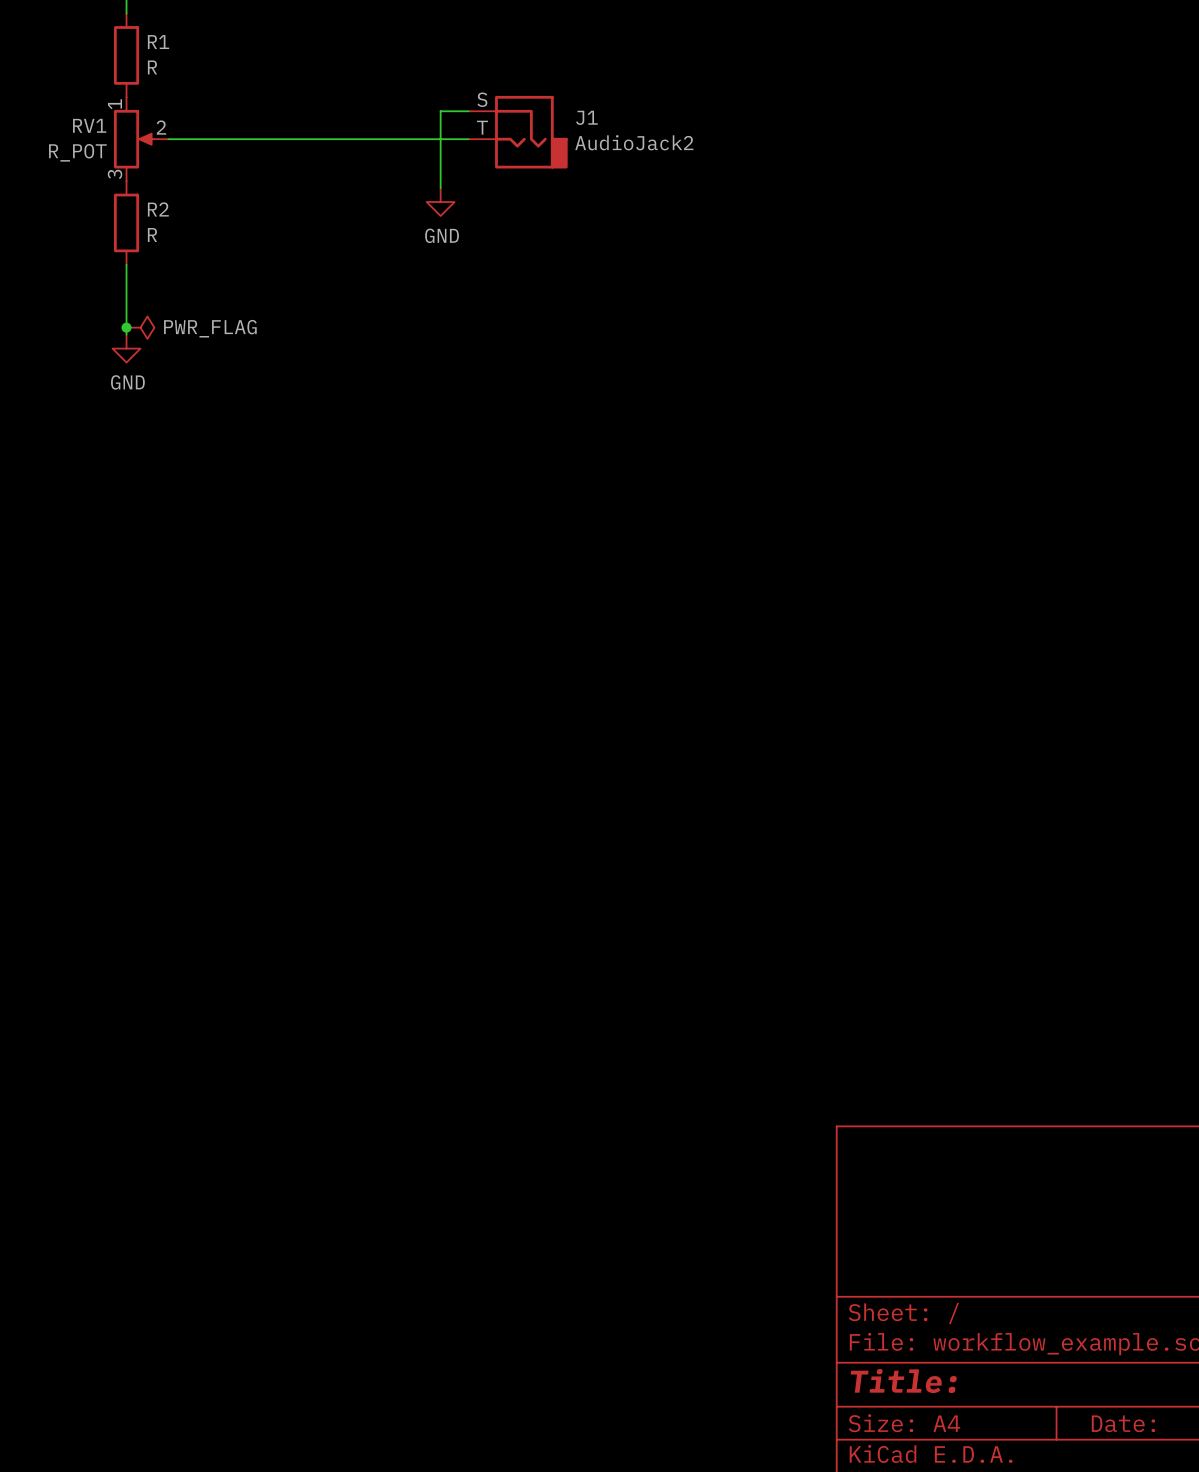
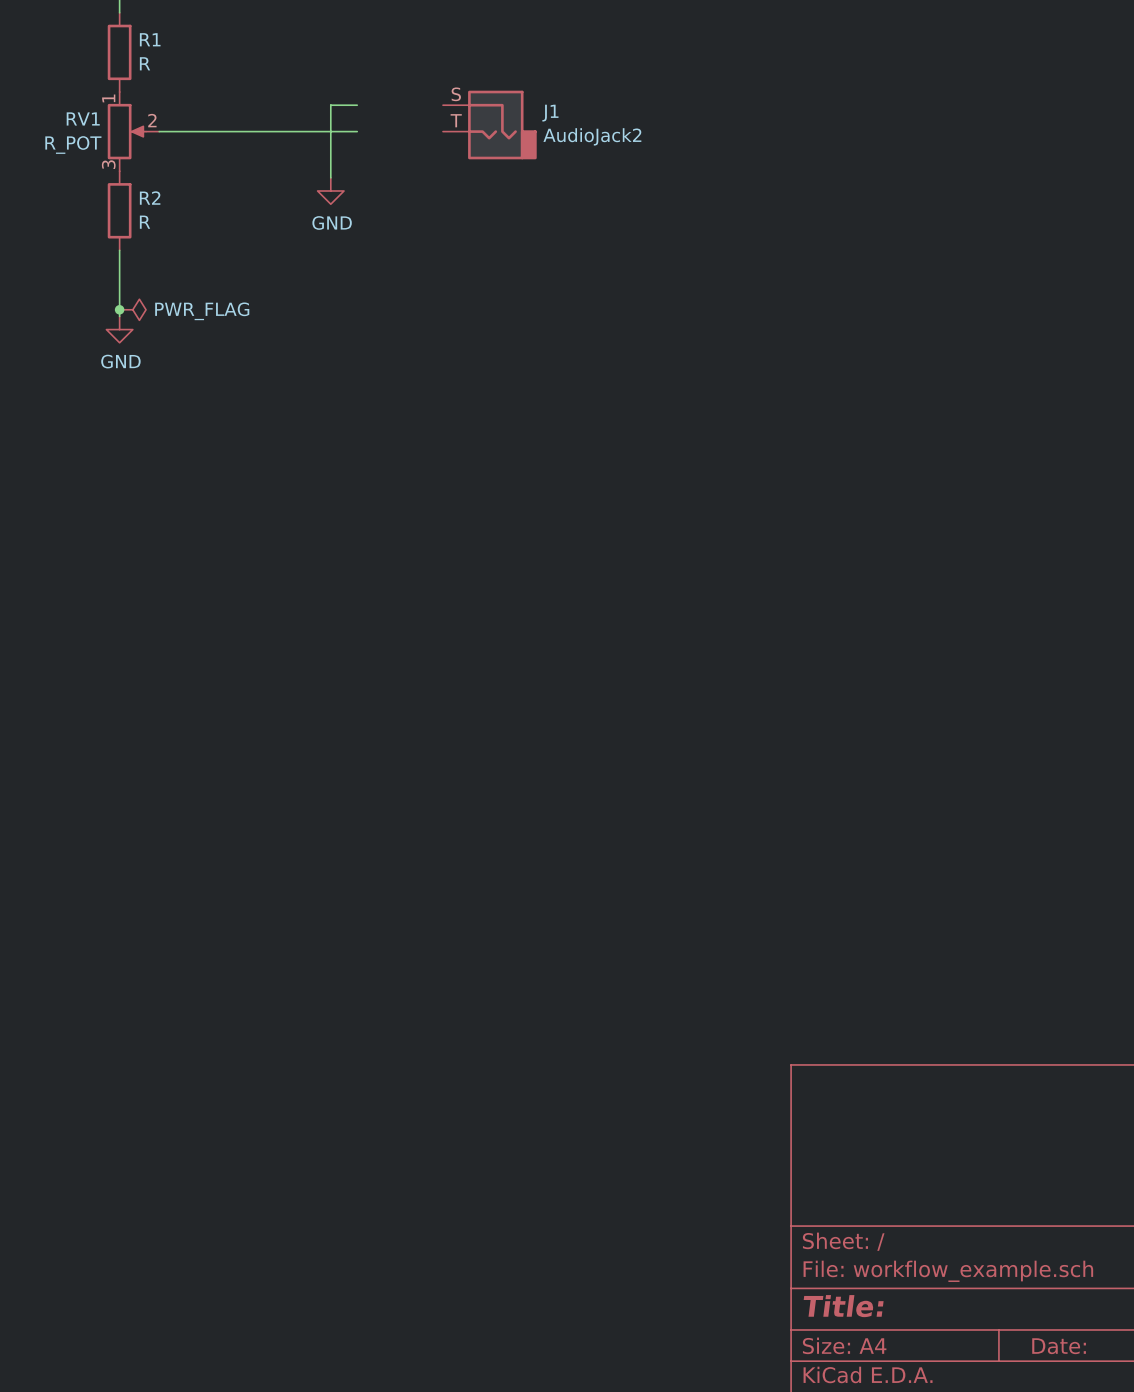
wire: (468, 111) (440, 111) (440, 188) -> (357, 105) (330, 105) (330, 177)
wire: (377, 139) (468, 139) -> none
power symbol position: GND (440, 202) -> GND (330, 191)

